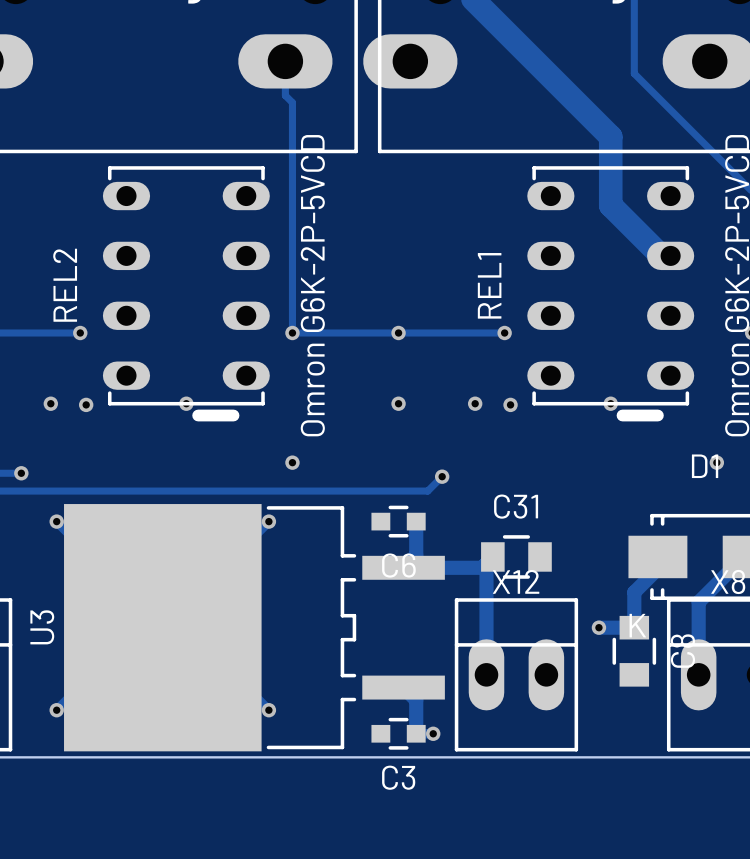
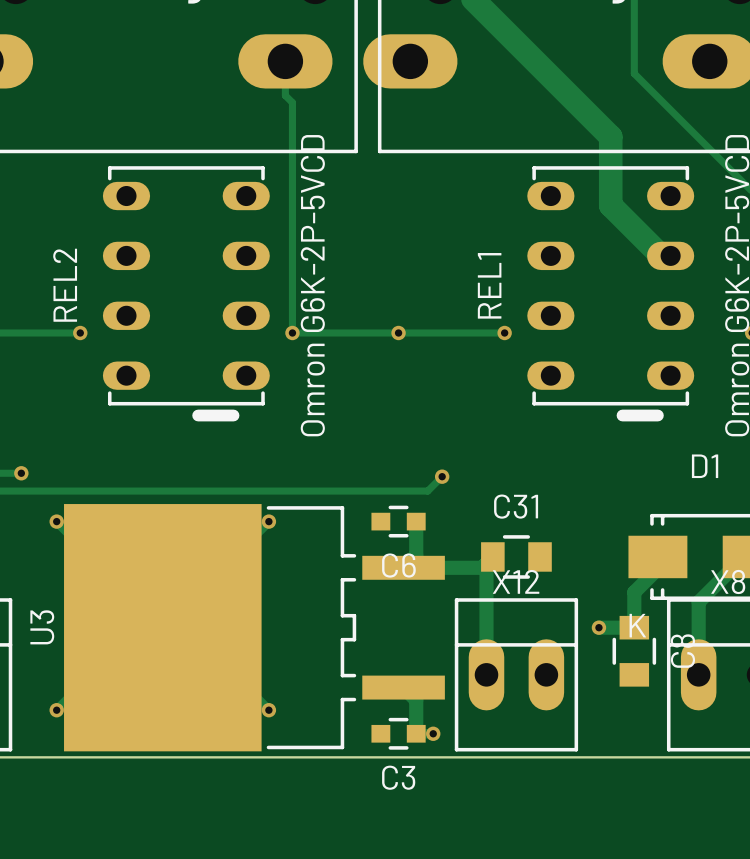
via: (50, 403) -> none
via: (186, 403) -> none
via: (398, 403) -> none
via: (475, 403) -> none
via: (610, 403) -> none
via: (86, 404) -> none
via: (510, 404) -> none
via: (292, 462) -> none
via: (716, 462) -> none

